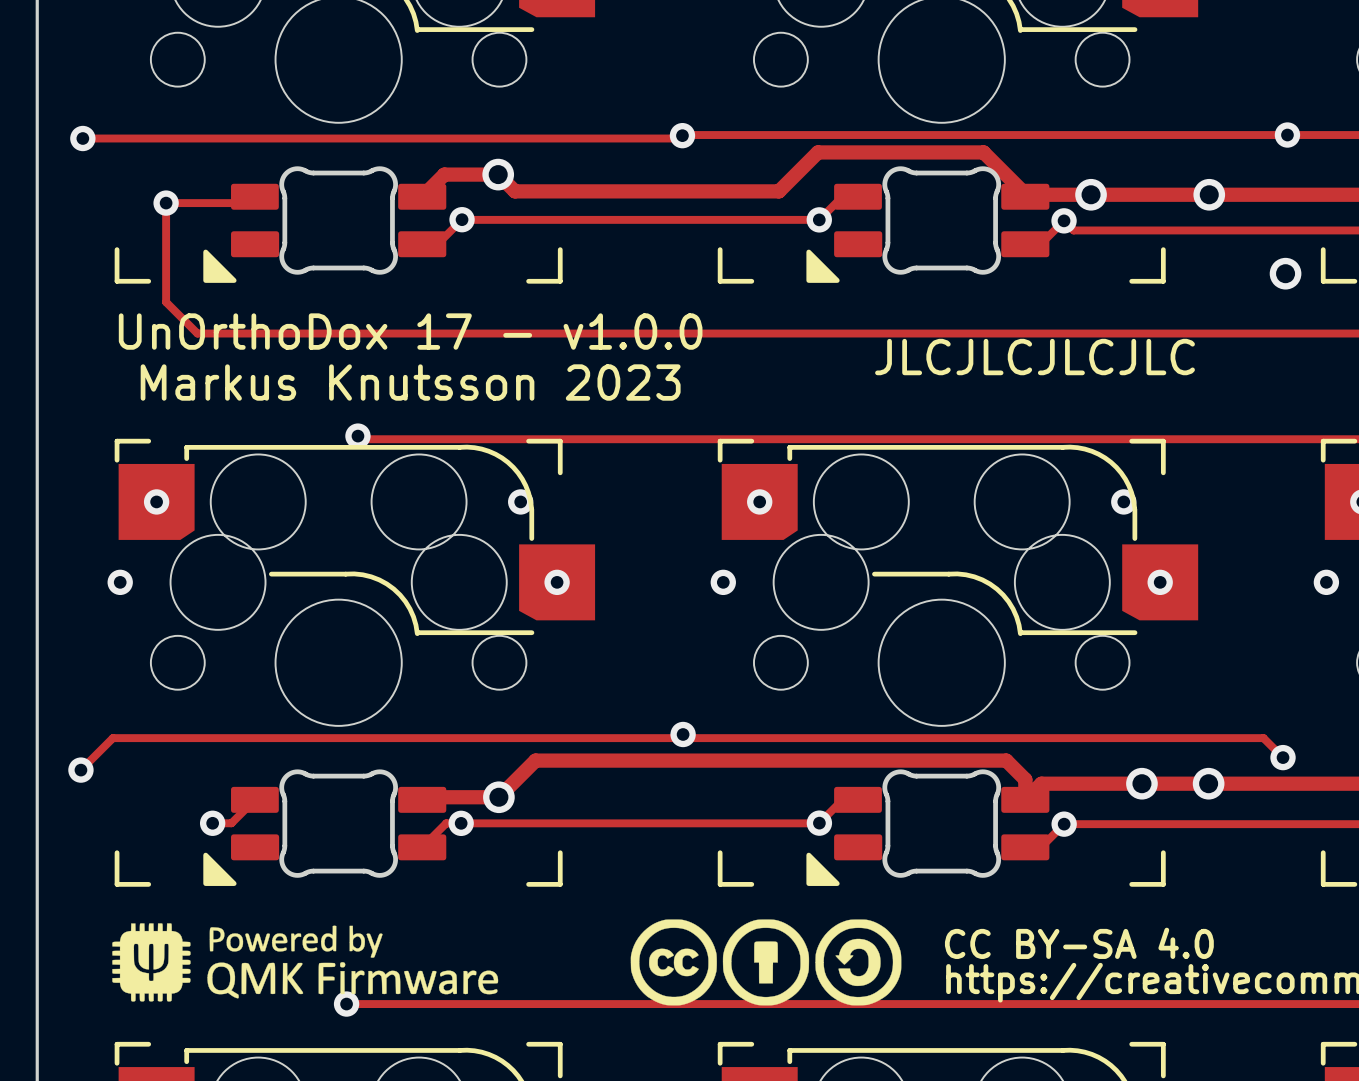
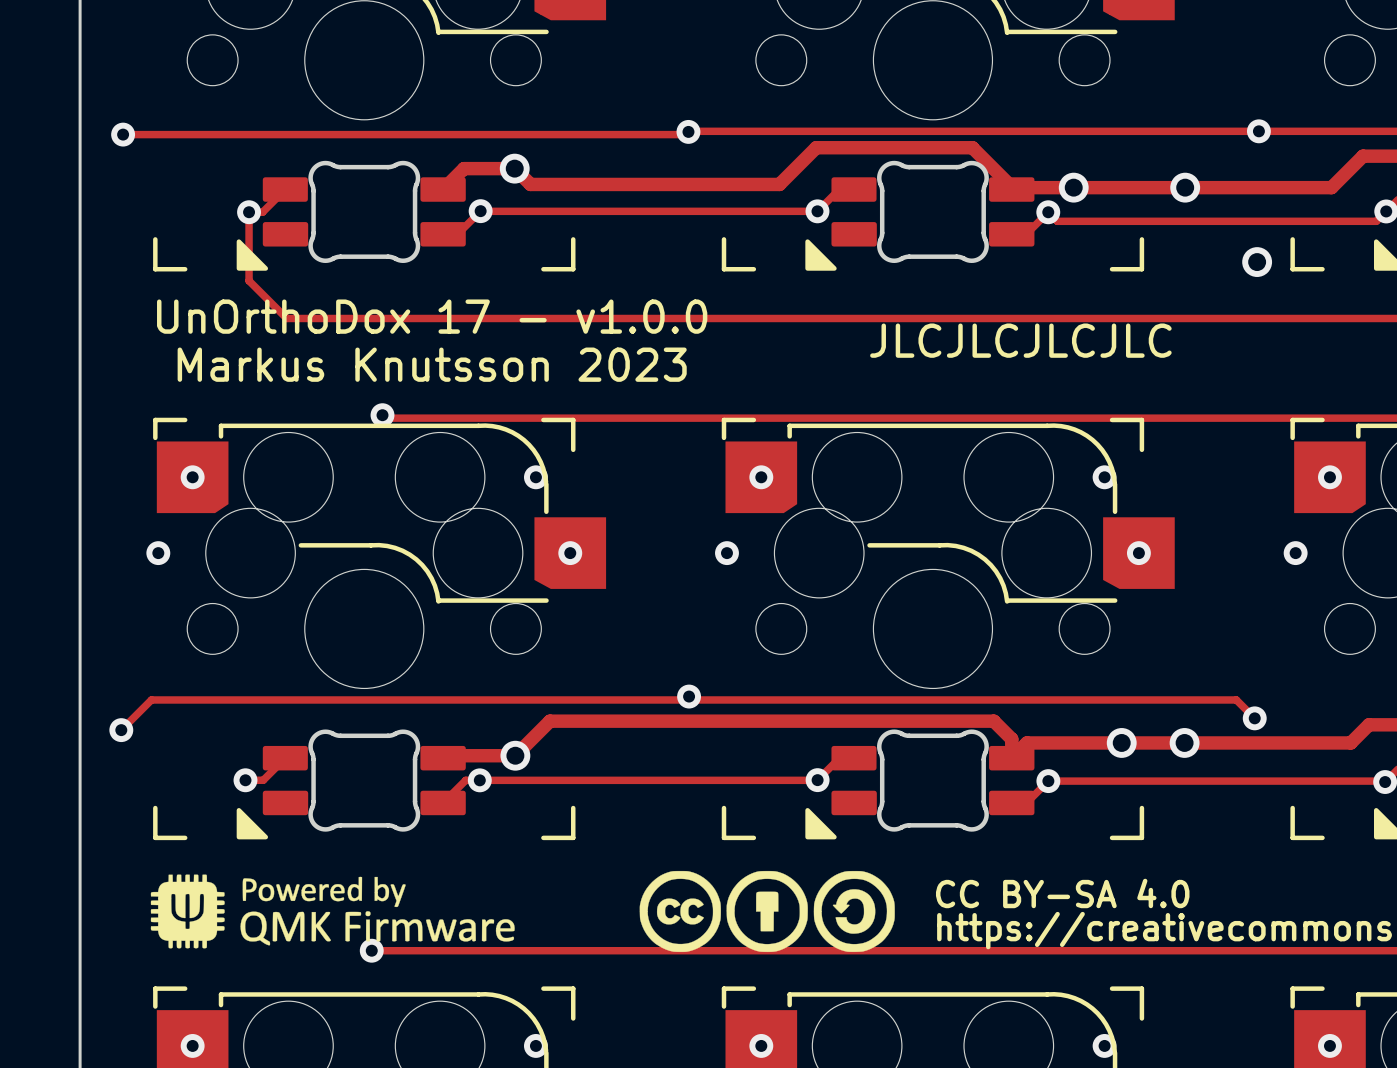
via position: (166, 203) -> (249, 212)
track: (248, 203) (166, 203) (166, 302) (197, 333) (256, 333) -> (279, 195) (262, 212) (249, 212) (249, 280) (286, 318)

